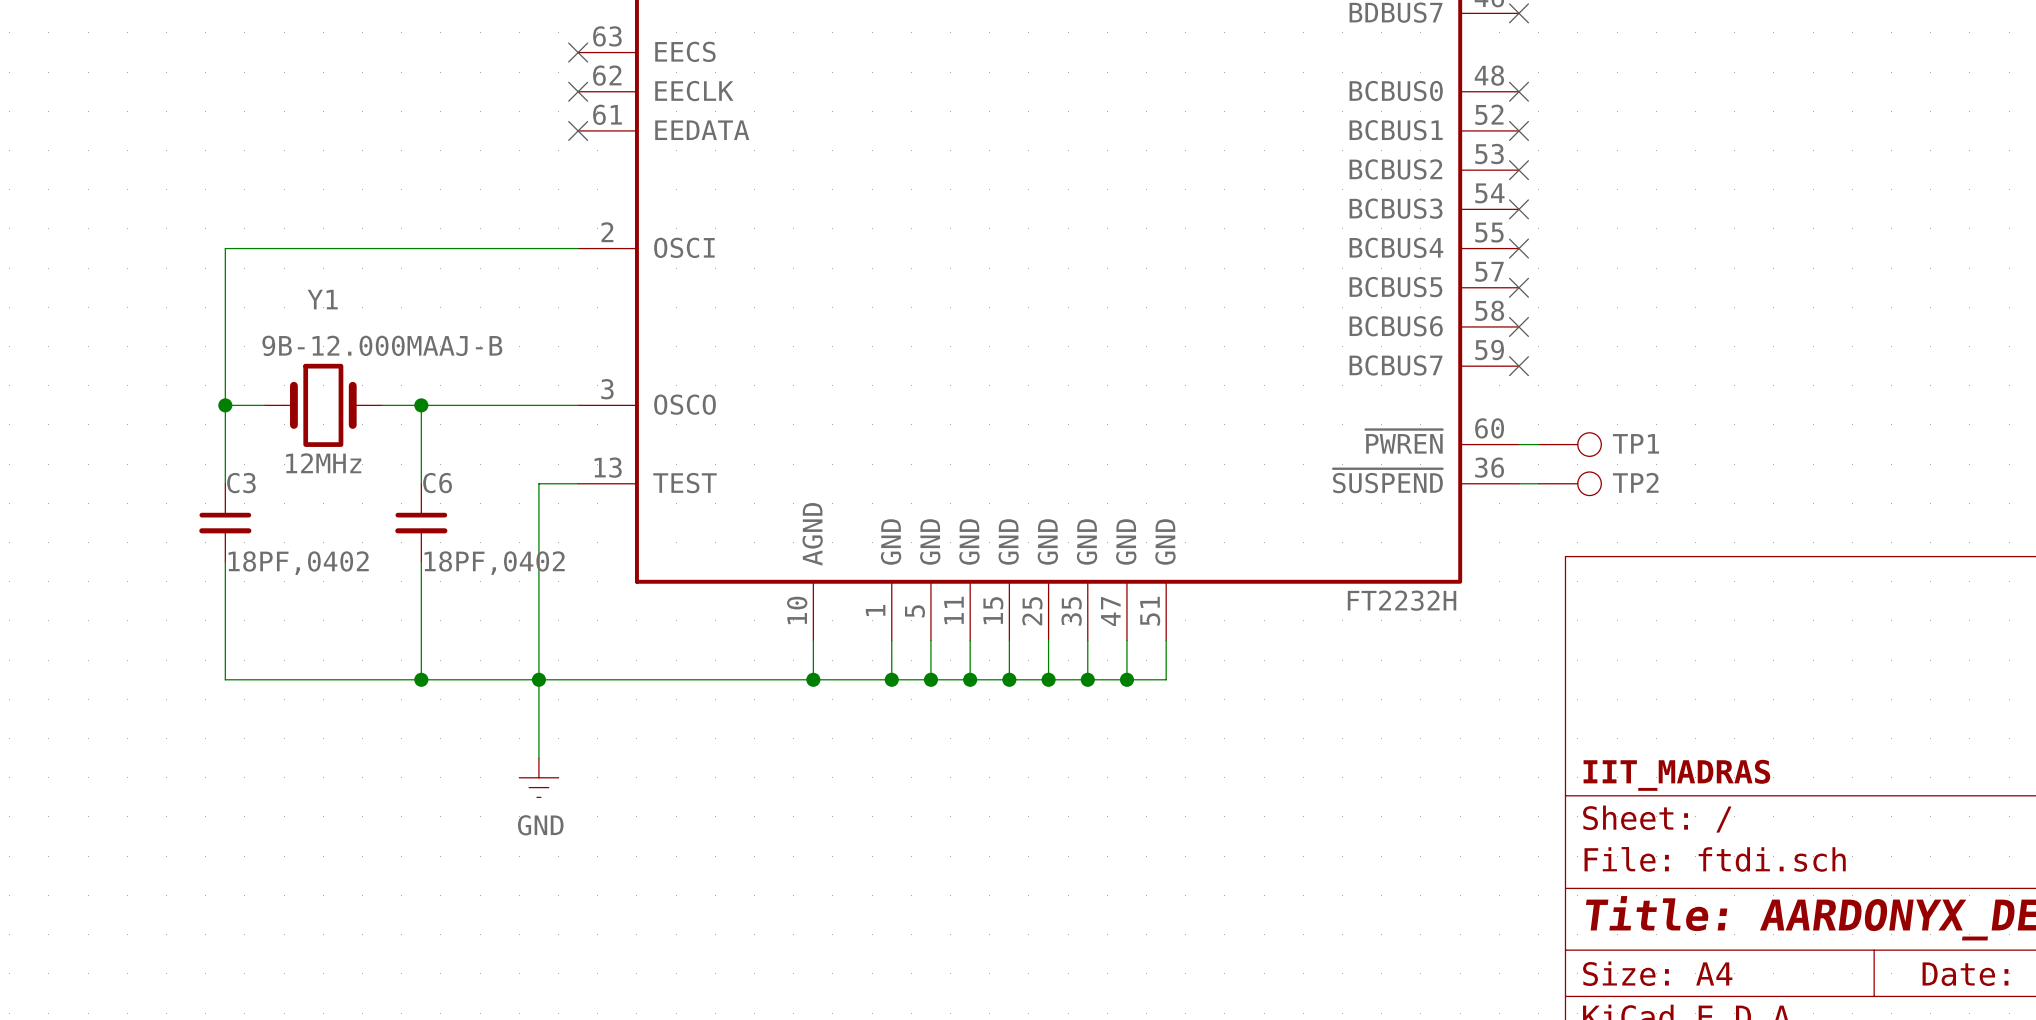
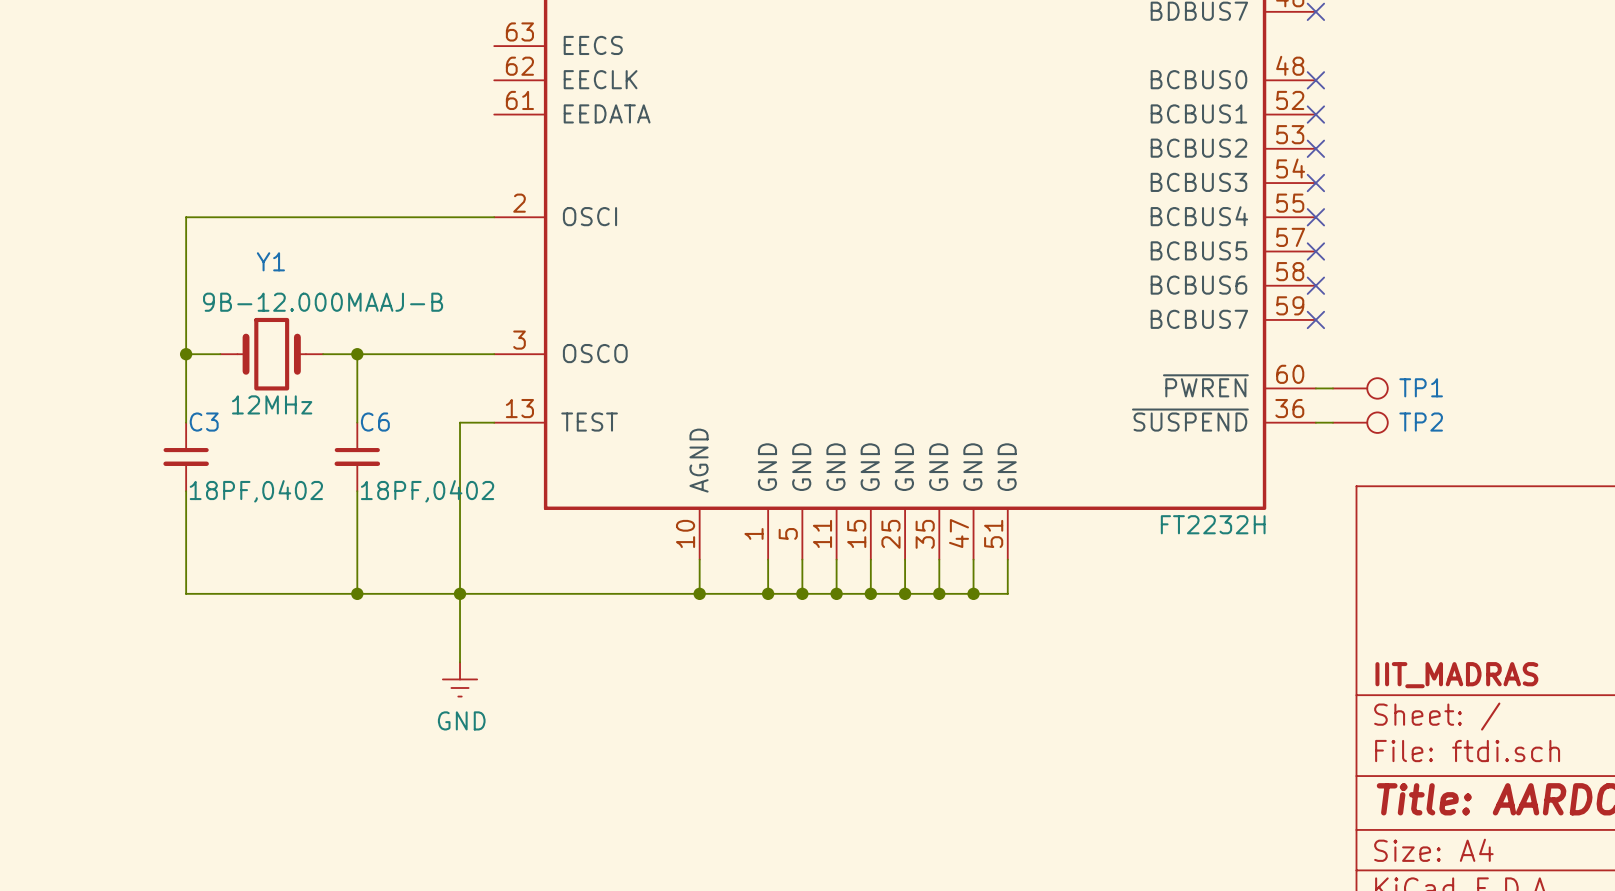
no-connect mark: (578, 52) -> none
no-connect mark: (578, 91) -> none
no-connect mark: (578, 130) -> none

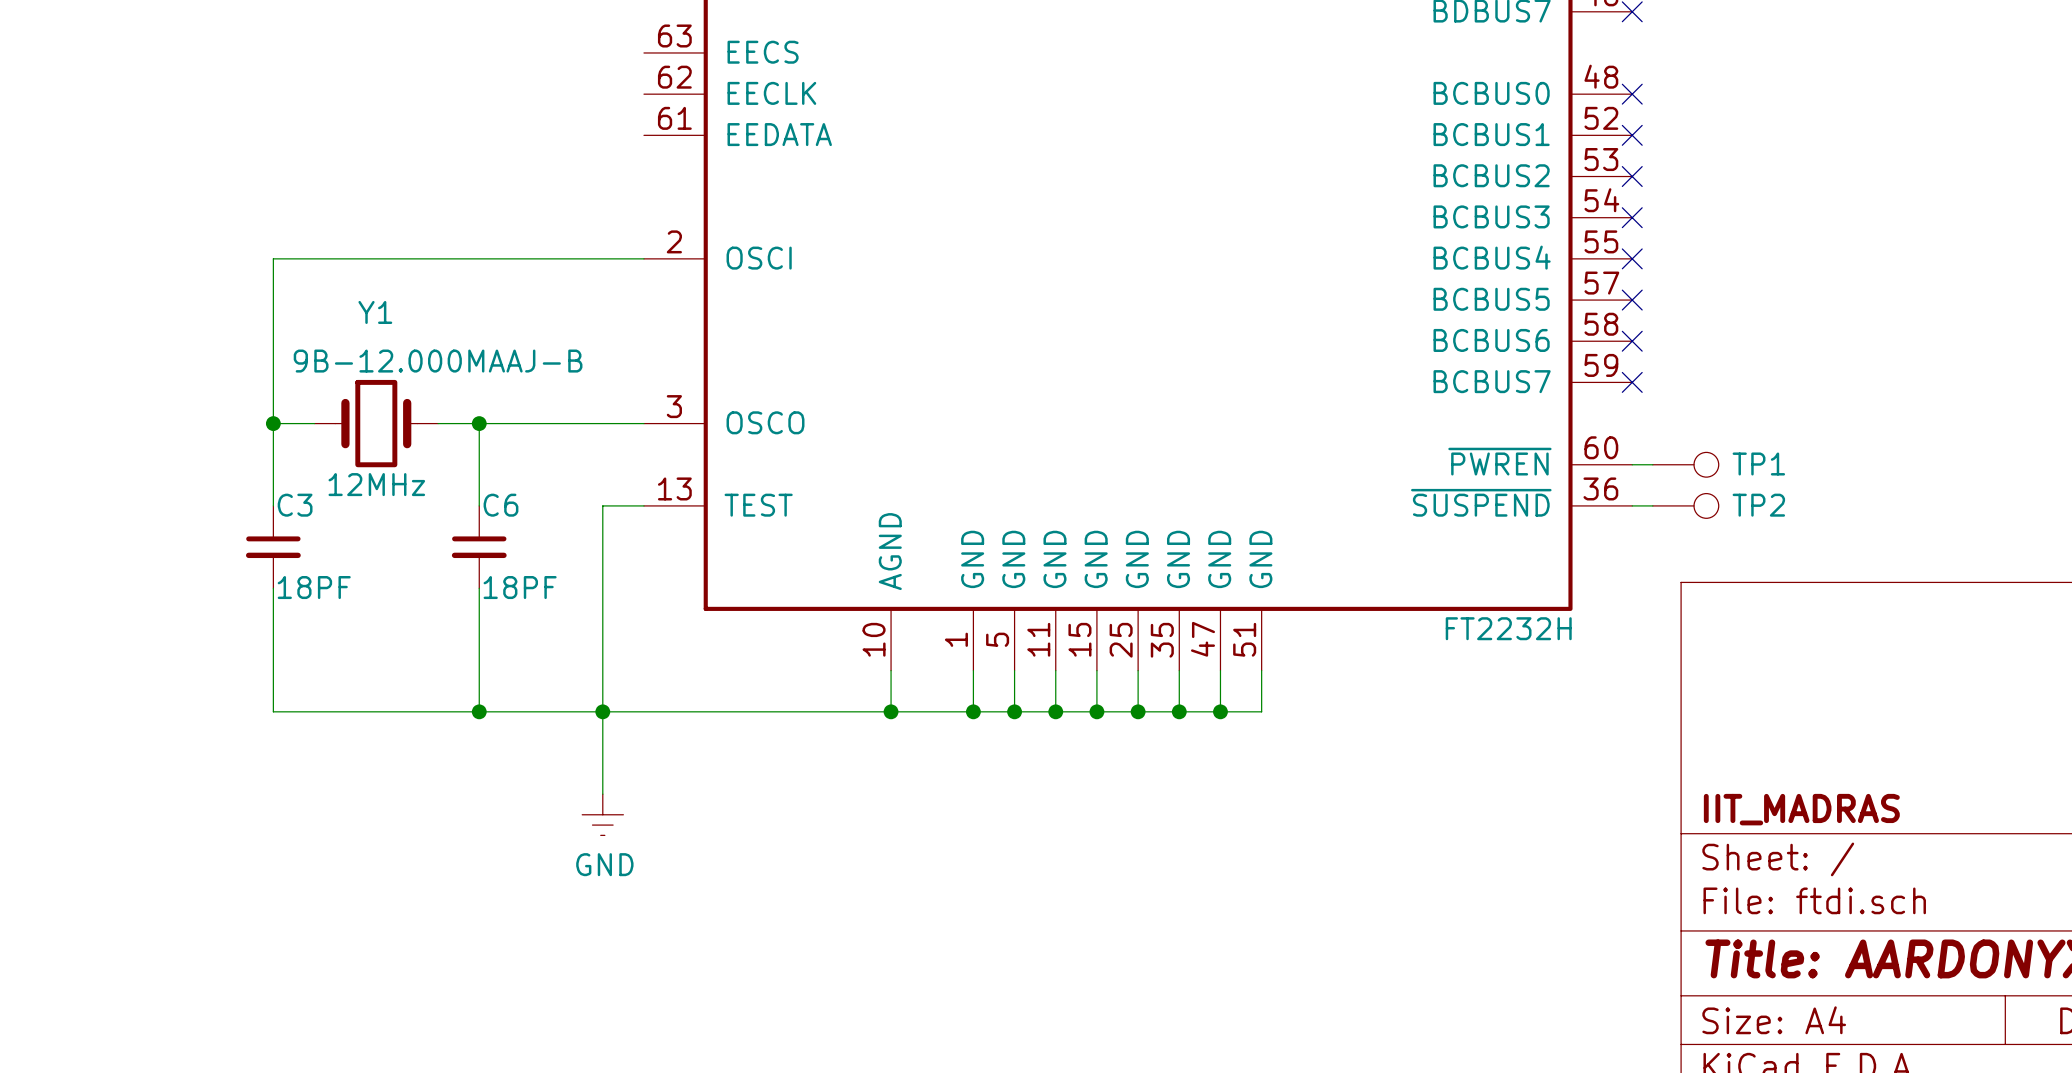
C3 value: 18PF,0402 (256, 491) -> 18PF (314, 587)
C6 value: 18PF,0402 (427, 491) -> 18PF (520, 587)

